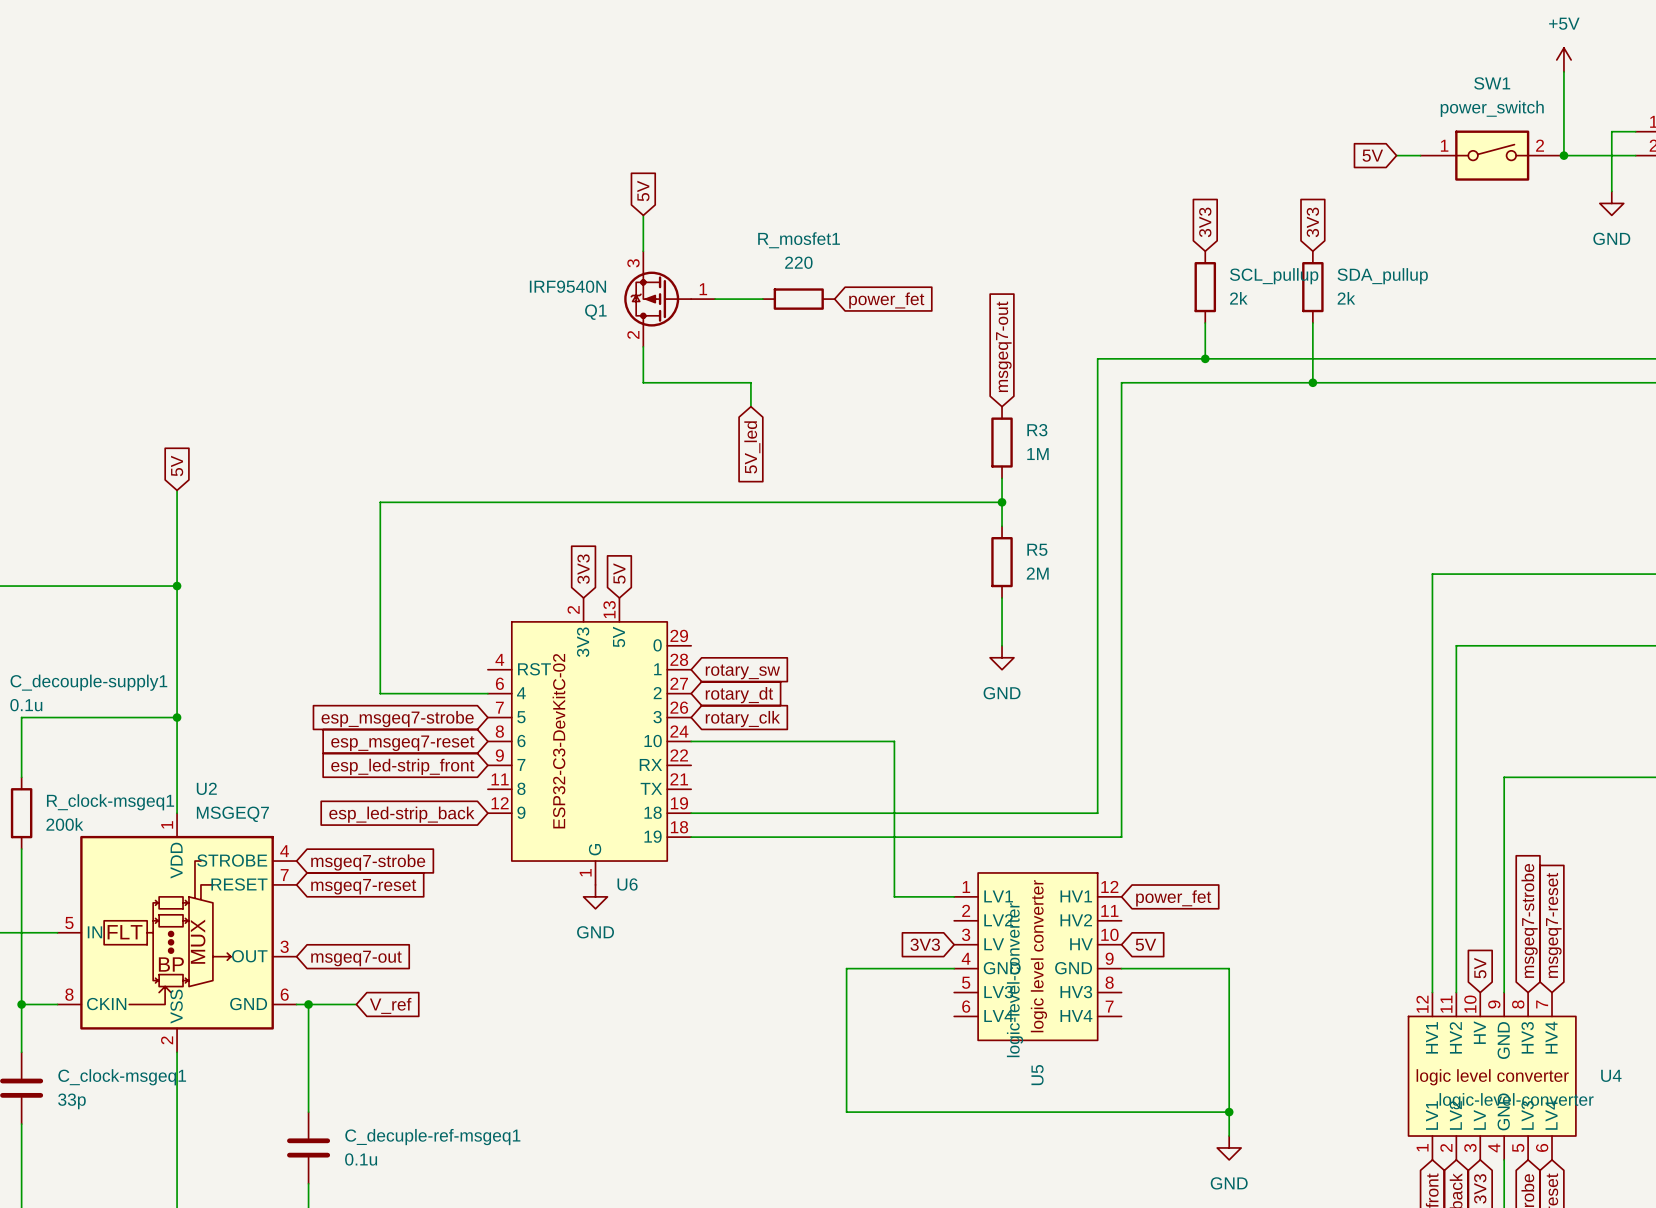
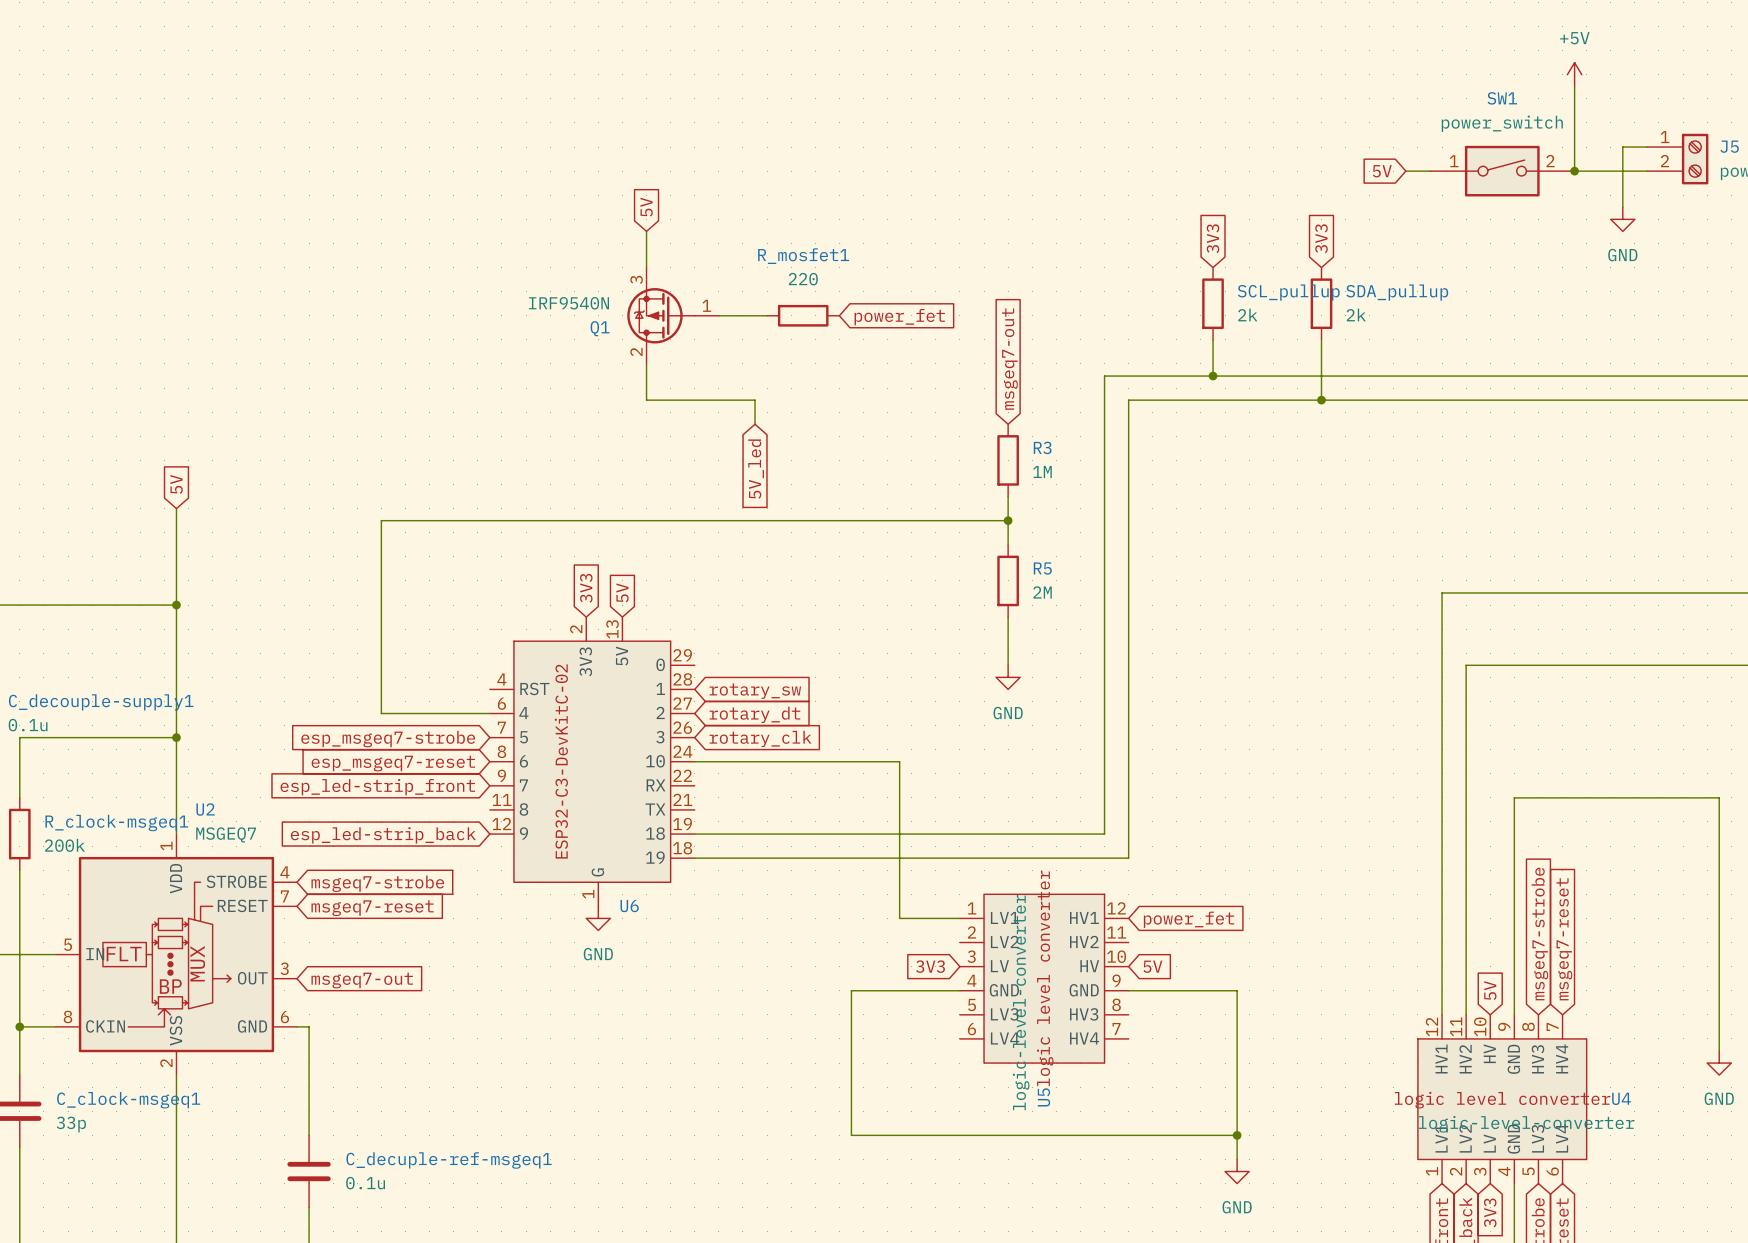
wire: (308, 1004) (356, 1004) -> none
junction: (308, 1004) -> none
global label: V_ref (390, 1005) -> none

